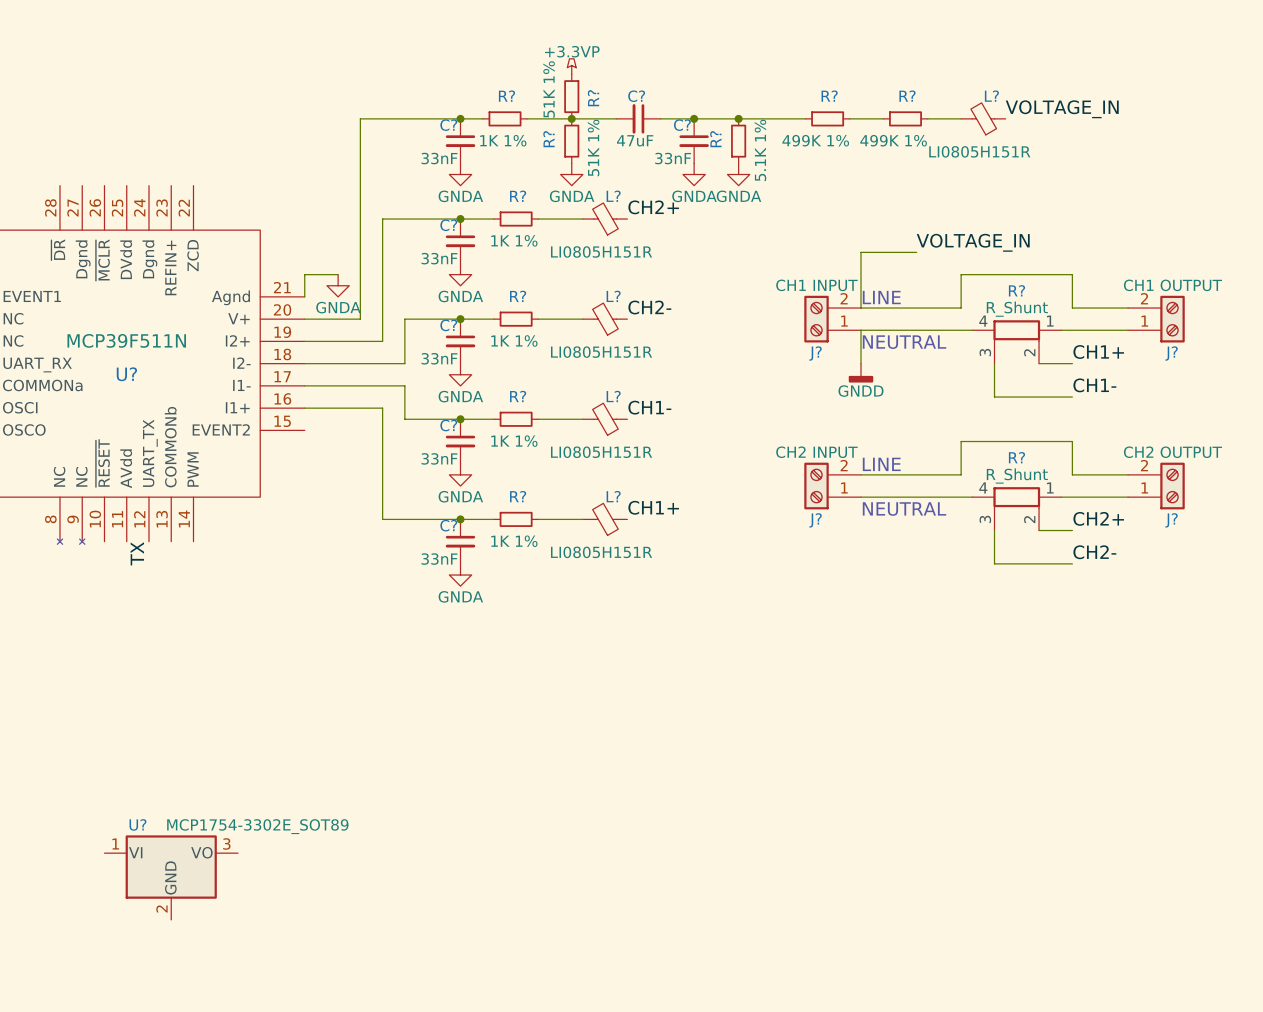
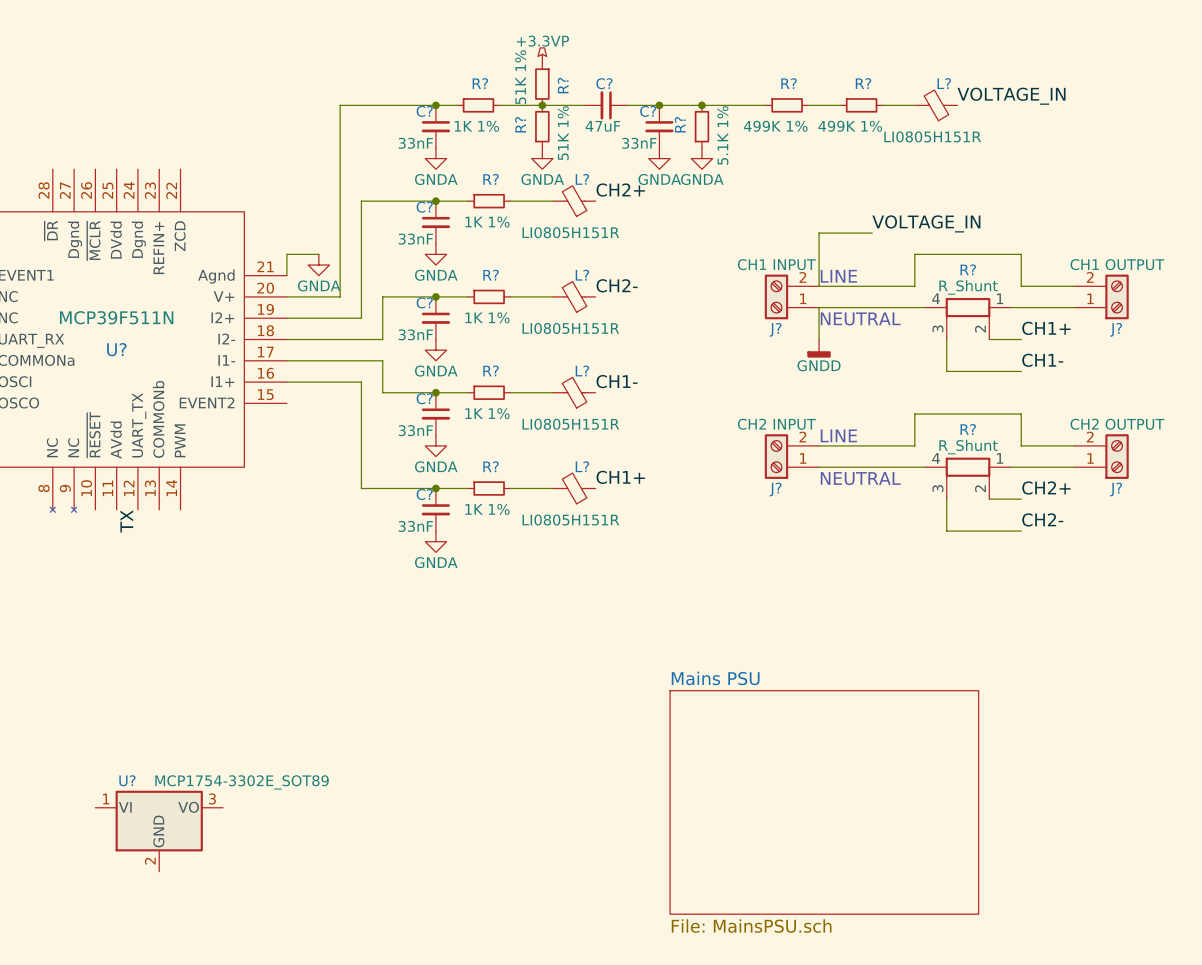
sheet Mains PSU: none -> File: MainsPSU.sch (824, 802)

